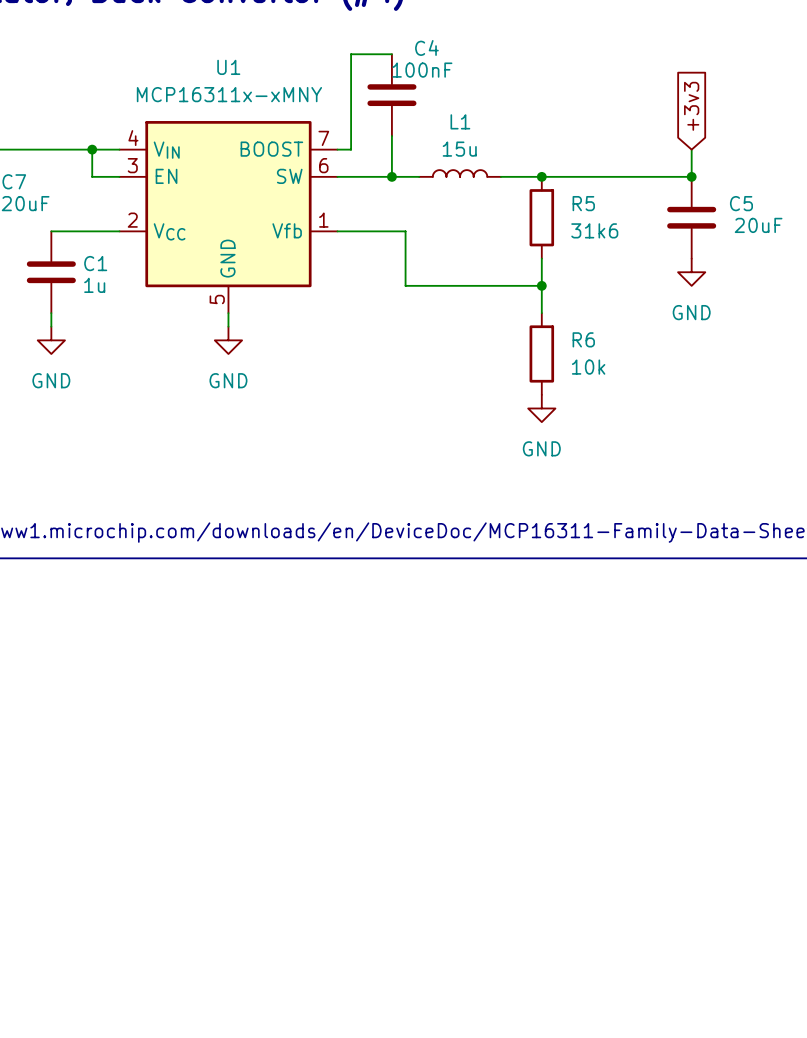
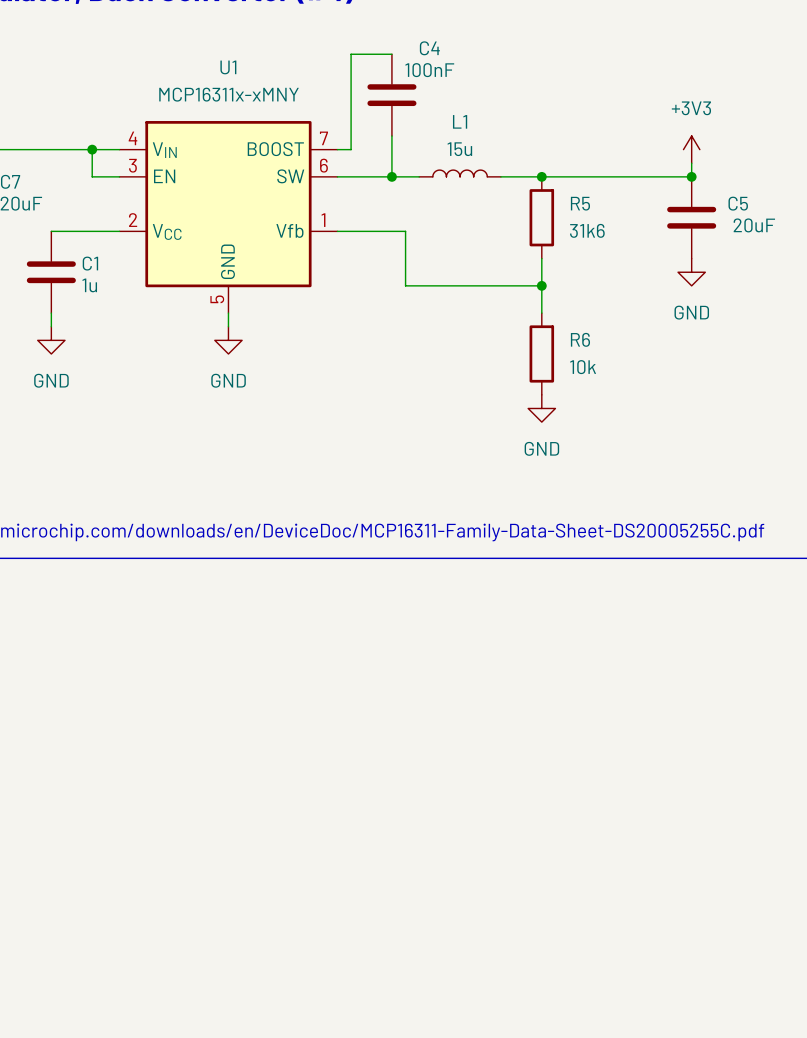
global label: +3v3 (691, 106) -> none
power symbol: none -> +3V3 (691, 149)

